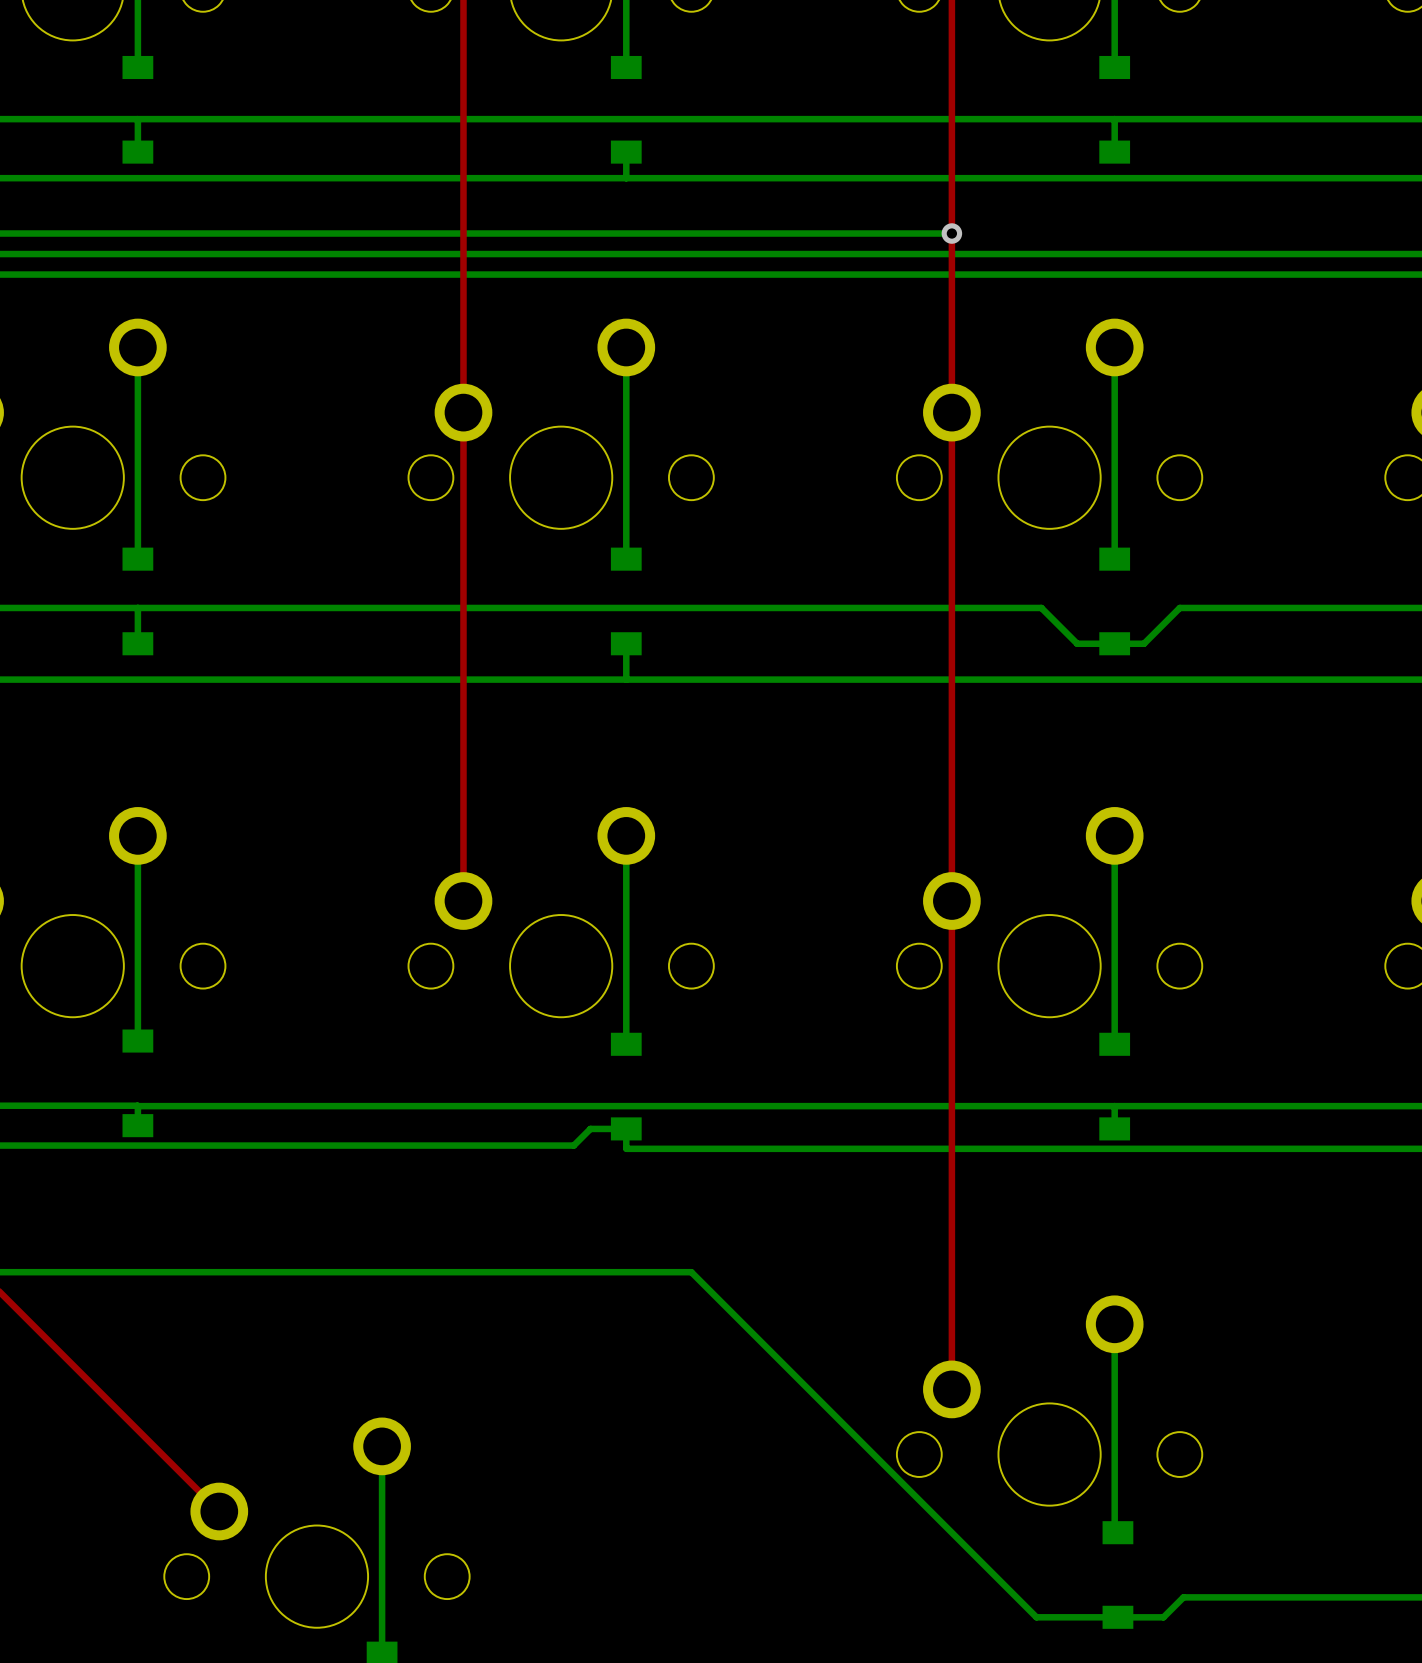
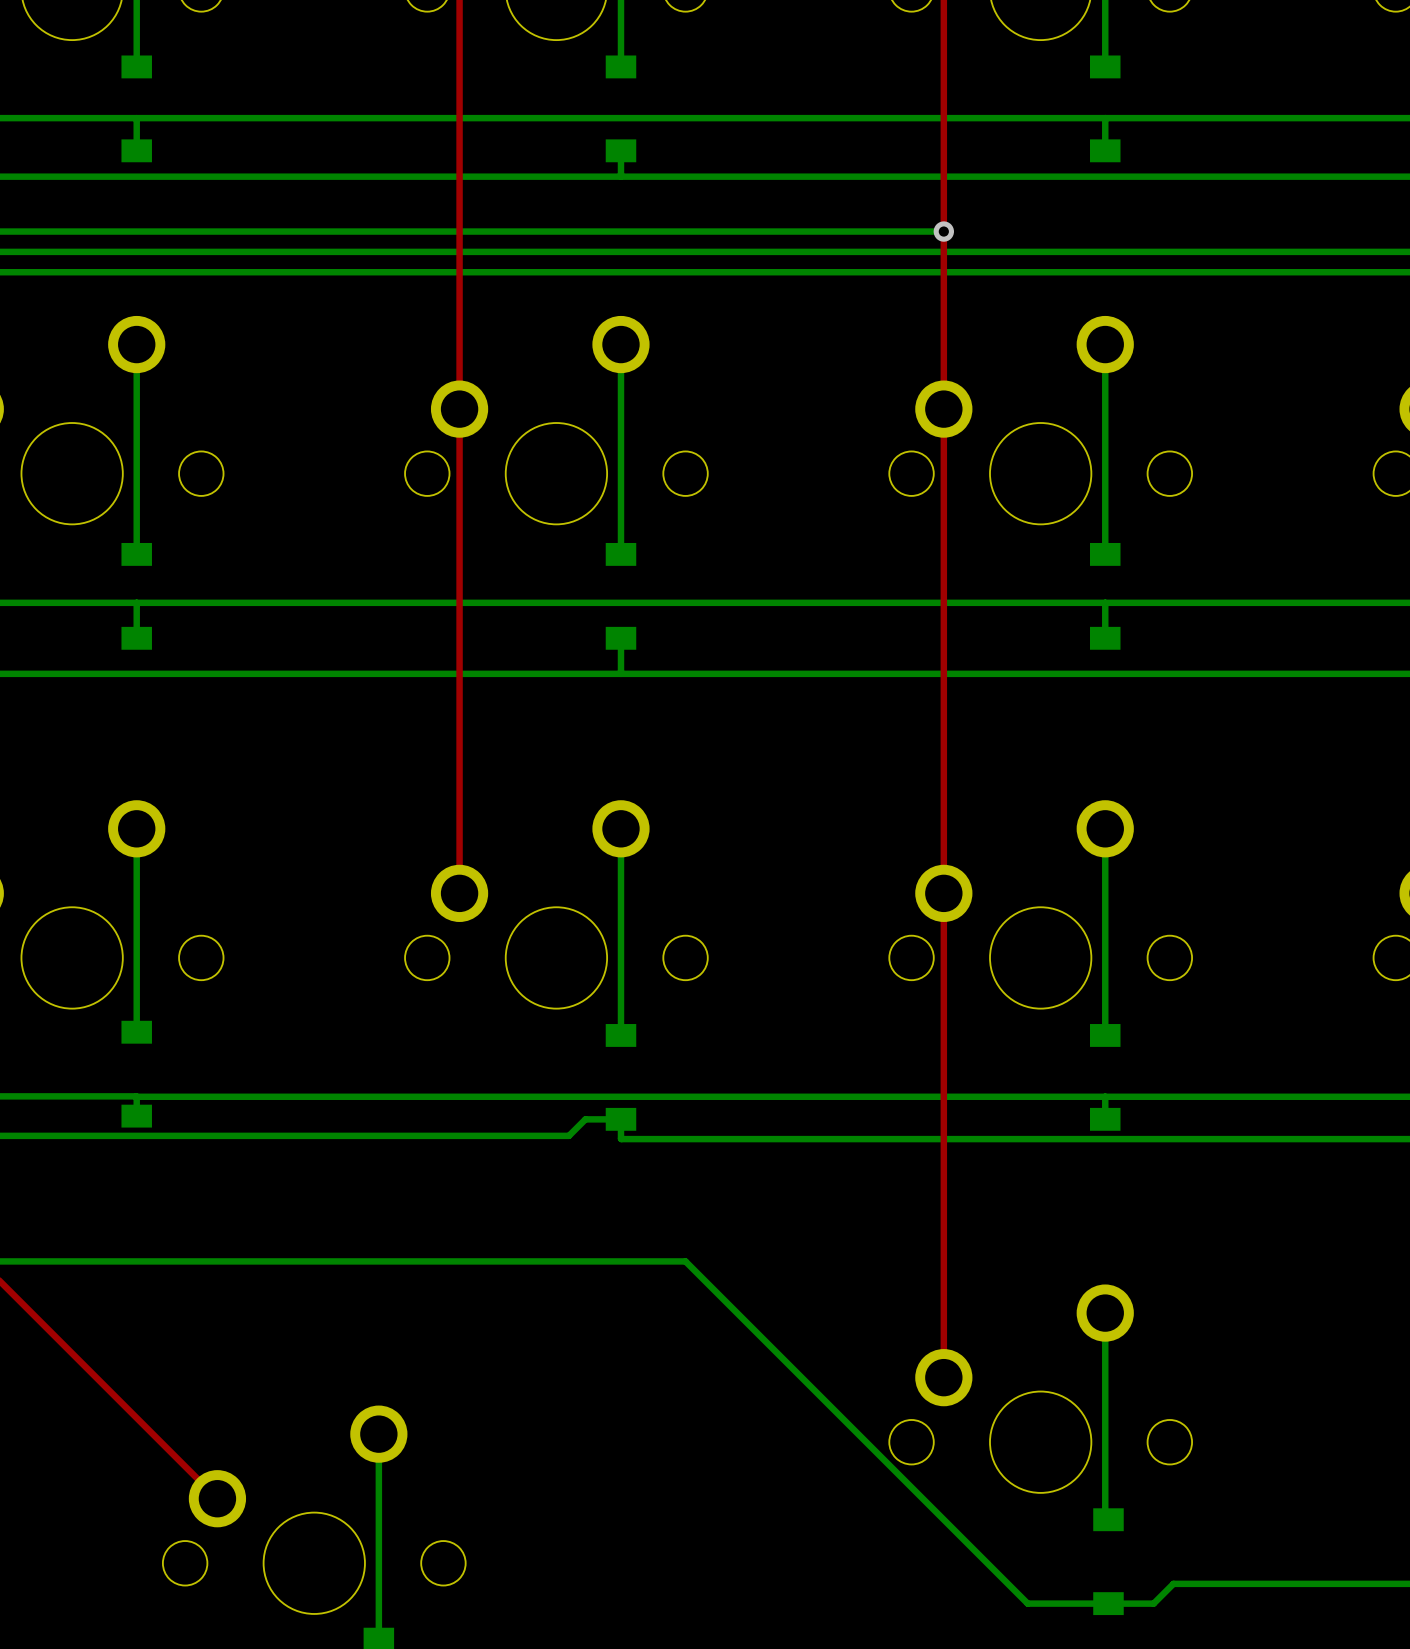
bottom track: (1041, 607) (1077, 643) (1144, 643) (1179, 607) -> (1032, 602) (1169, 602)
bottom track: none -> (1105, 602) (1105, 638)

